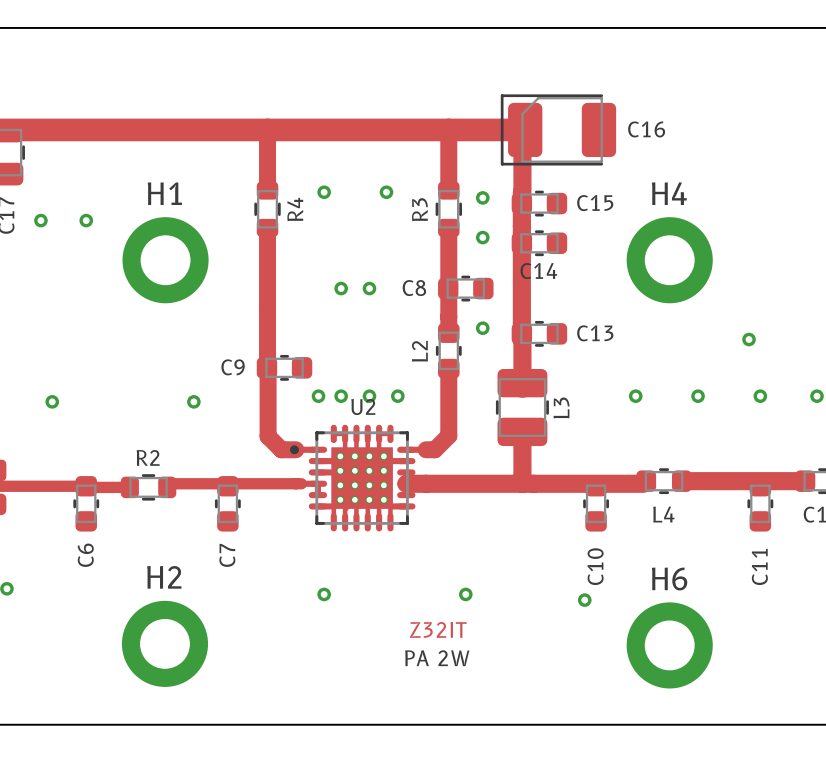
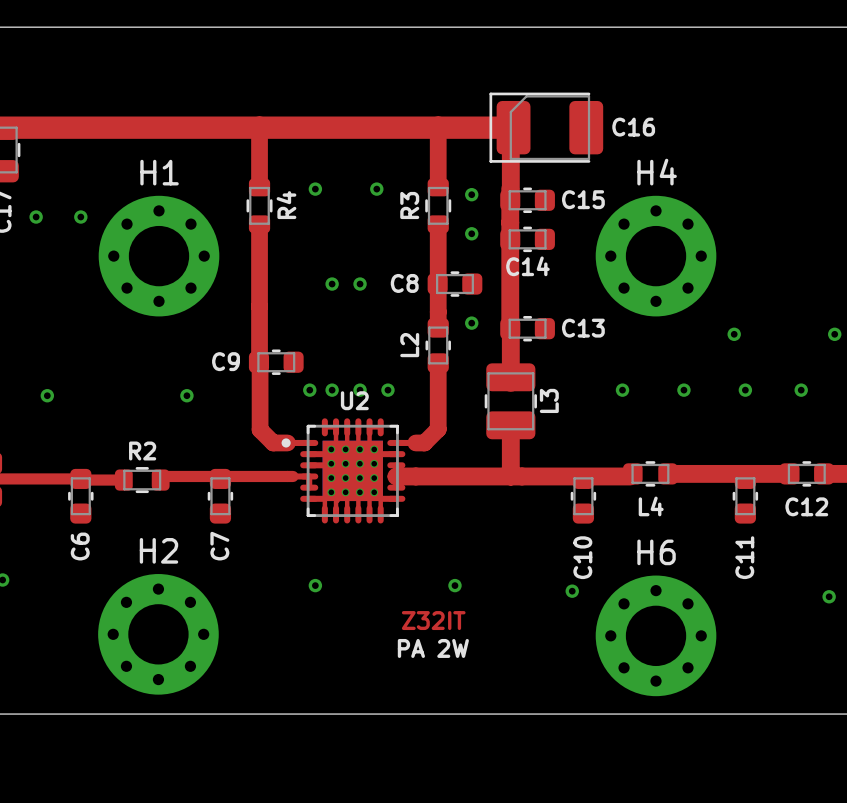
H1 footprint: [122, 217, 209, 304] -> [98, 195, 220, 317]
H4 footprint: [626, 217, 713, 304] -> [595, 195, 717, 317]
H2 footprint: [121, 600, 209, 687] -> [98, 574, 219, 695]
H6 footprint: [626, 602, 713, 689] -> [595, 575, 717, 697]

